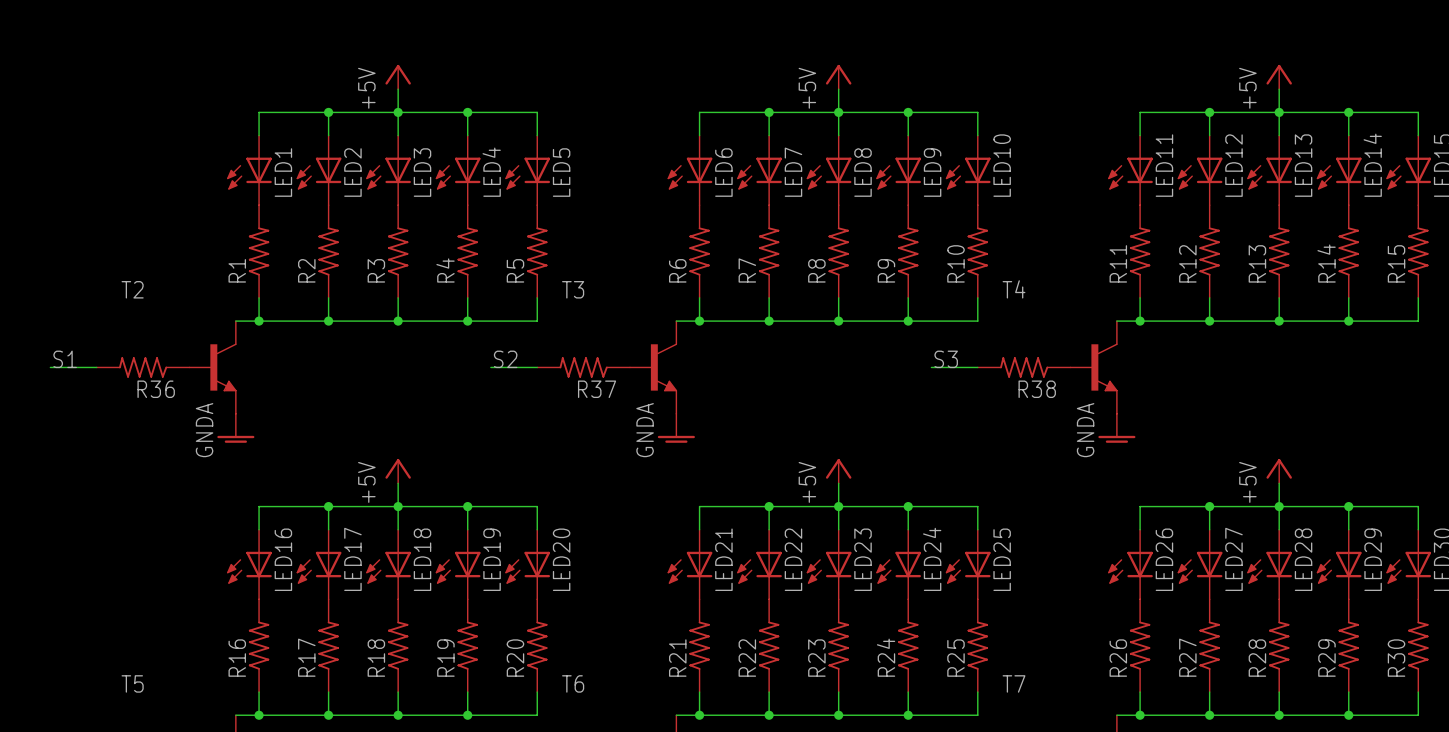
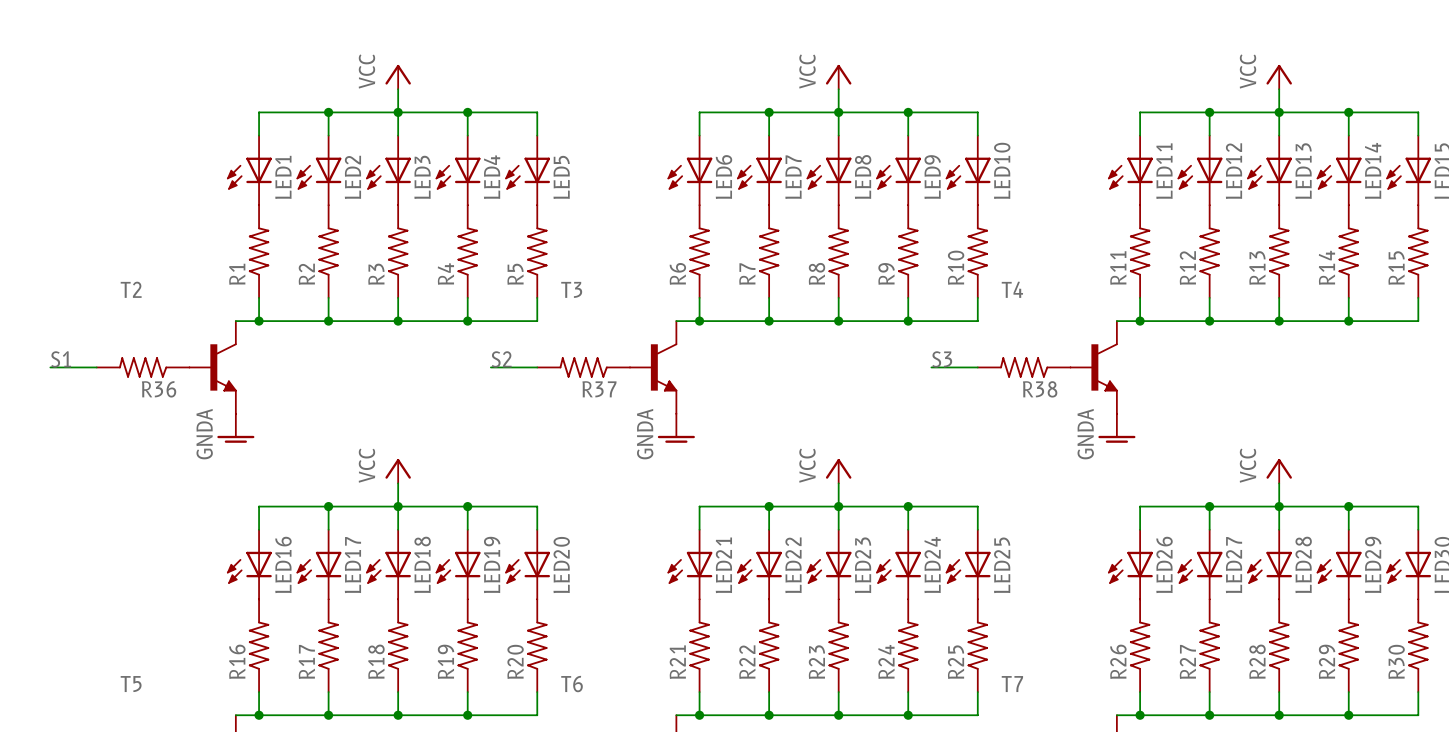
power symbol: +5V (398, 77) -> VCC (398, 77)
power symbol: +5V (838, 77) -> VCC (838, 77)
power symbol: +5V (1279, 77) -> VCC (1279, 77)
power symbol: +5V (398, 471) -> VCC (398, 471)
power symbol: +5V (838, 471) -> VCC (838, 471)
power symbol: +5V (1279, 471) -> VCC (1279, 471)

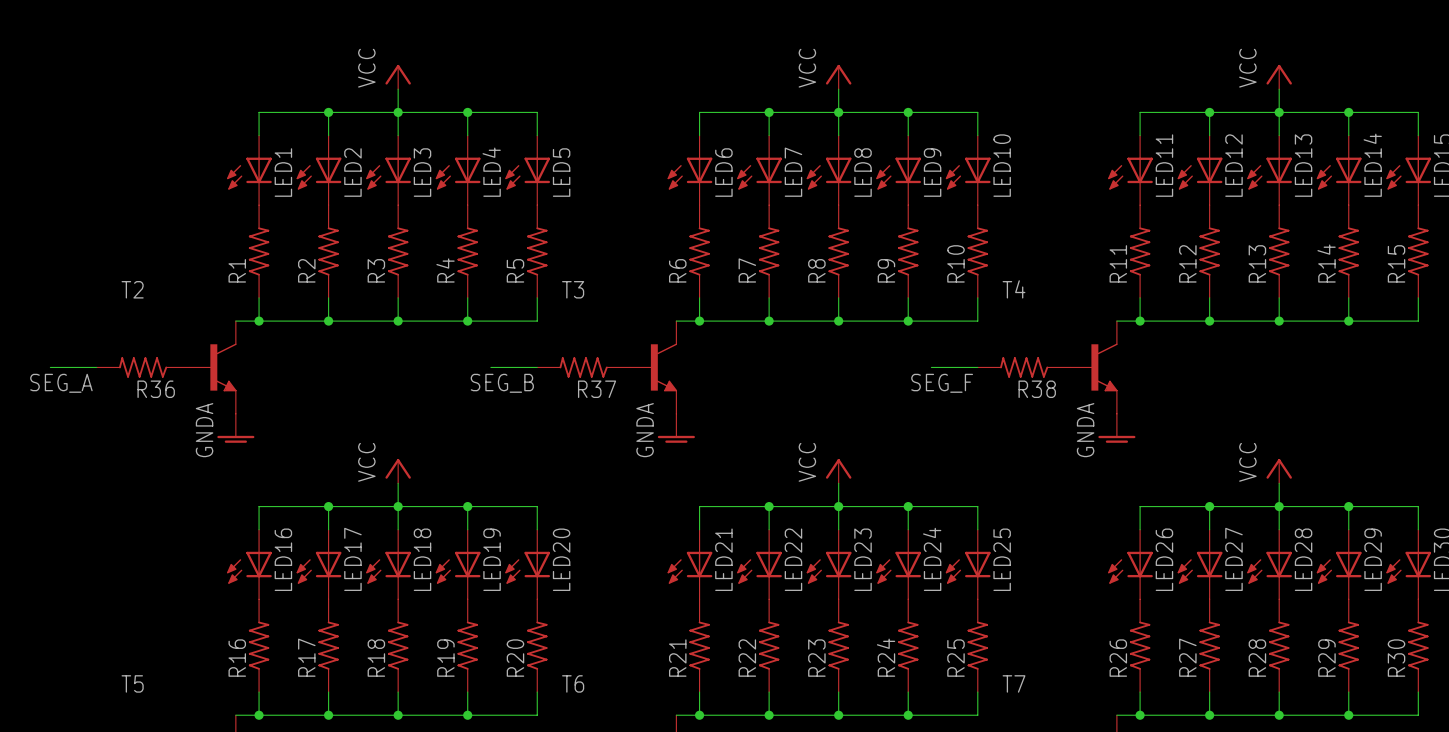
label: S1 (61, 359) -> none
label: S2 (501, 359) -> none
label: S3 (942, 359) -> none
label: none -> SEG_A (61, 383)
label: none -> SEG_B (502, 383)
label: none -> SEG_F (942, 383)

